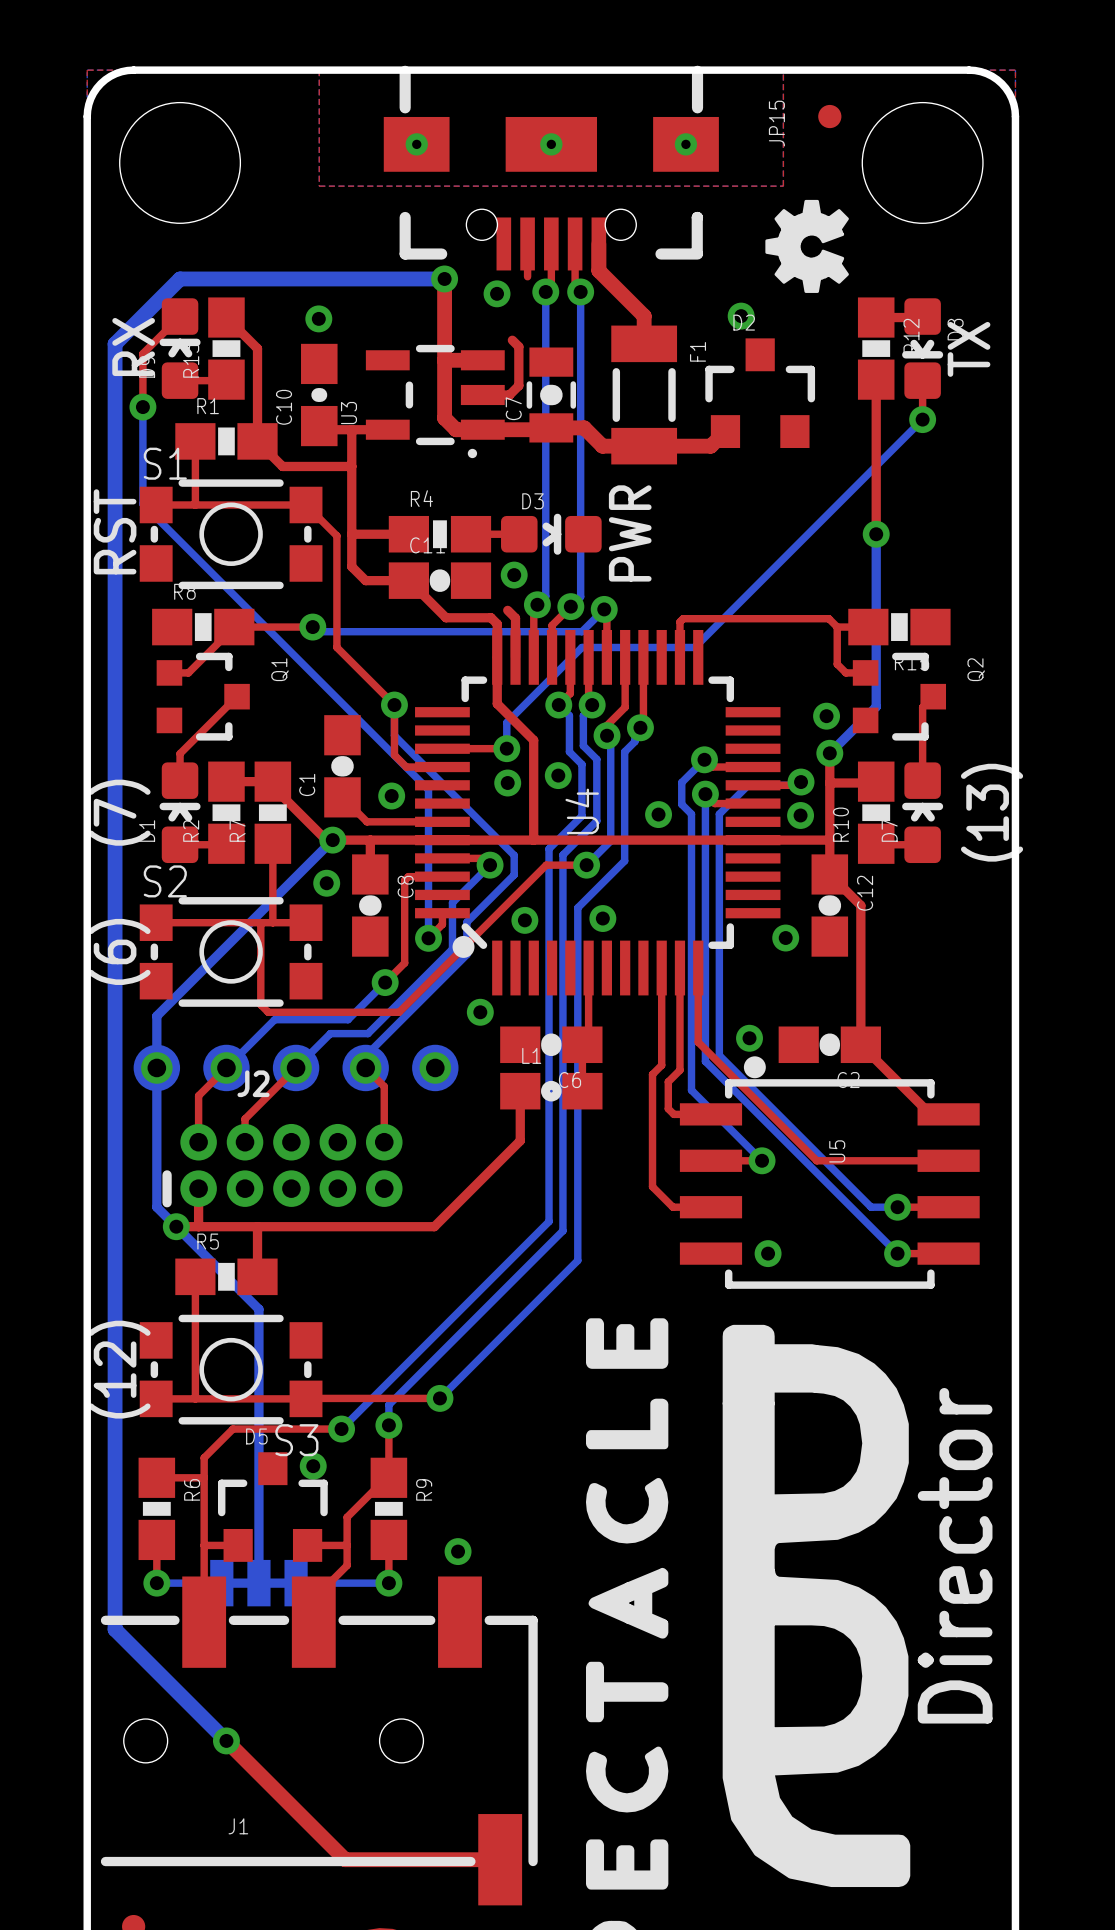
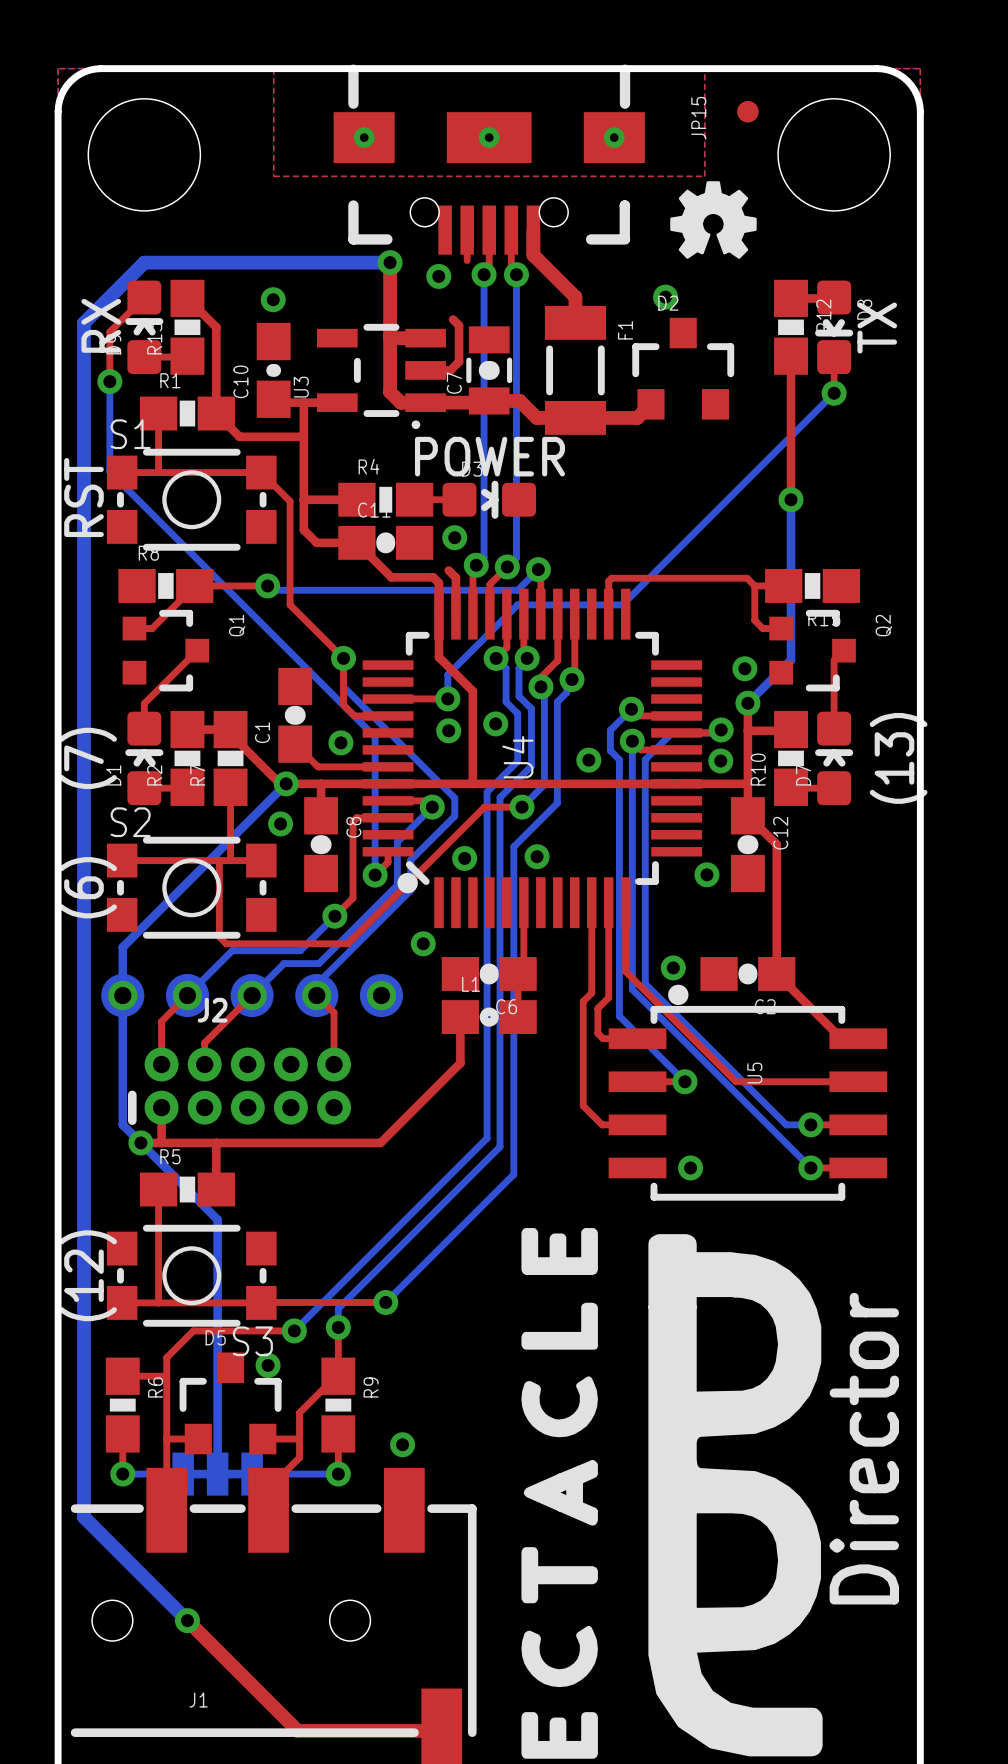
drawing shape: [765, 199, 849, 293] -> [670, 181, 757, 259]
text: PWR (630, 533) -> POWER (489, 456)

